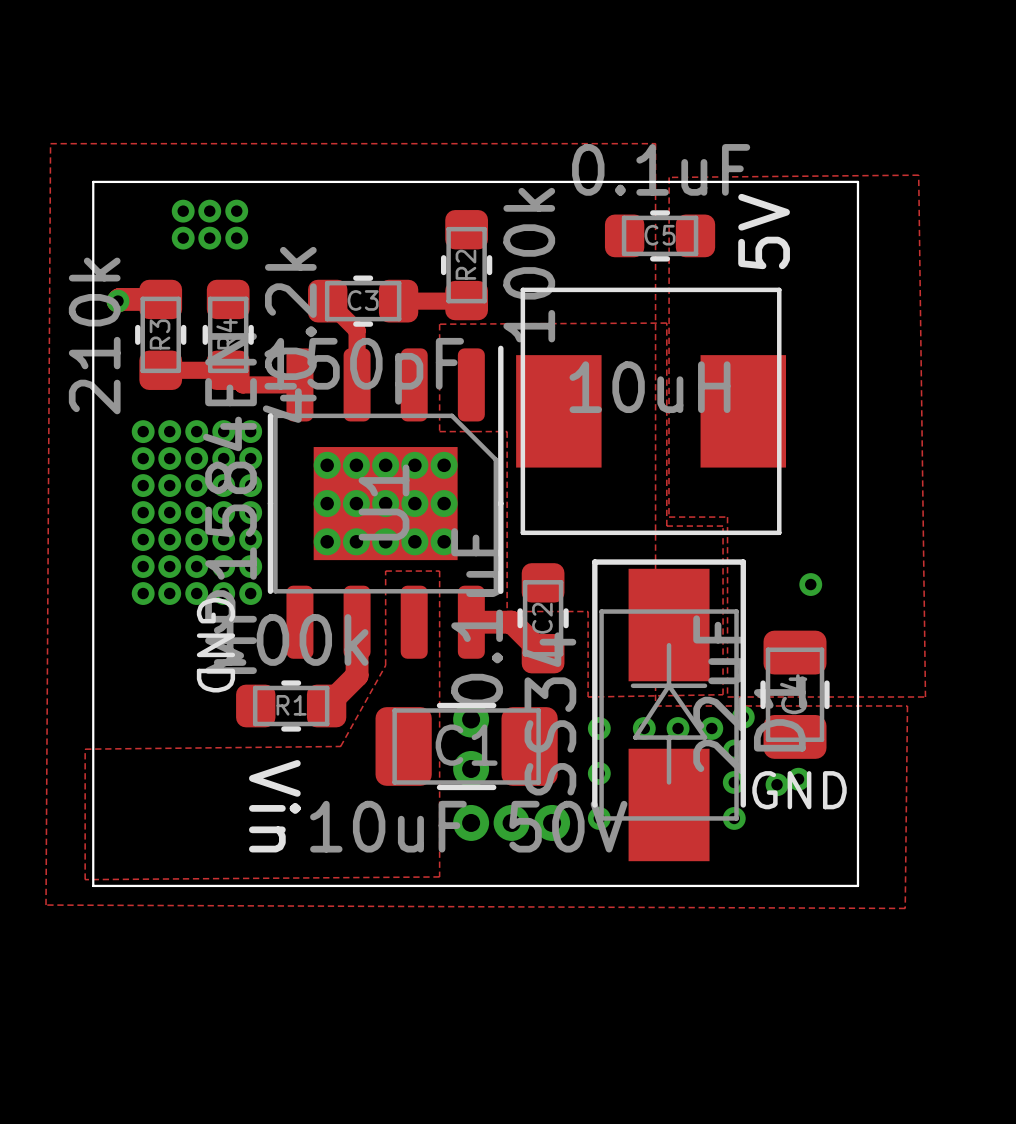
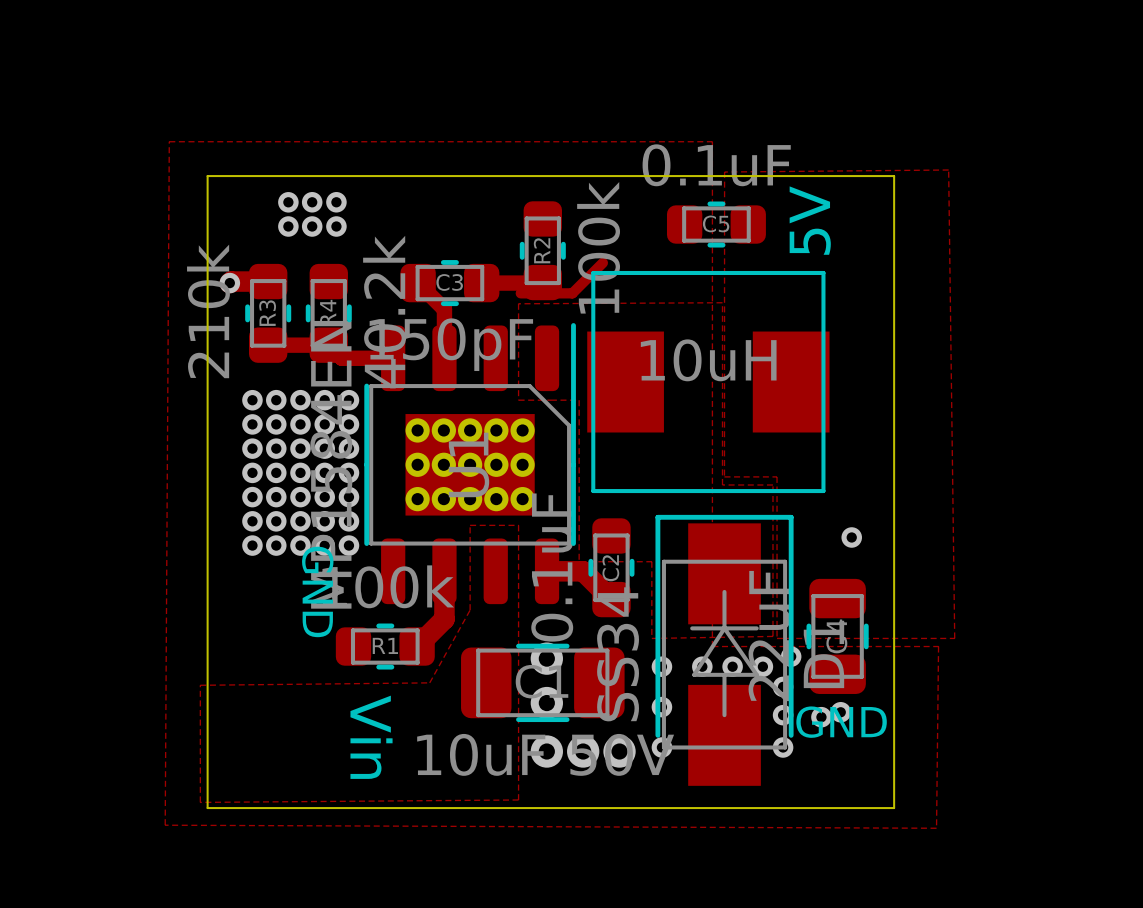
track: none -> (602, 262) (572, 293) (520, 293)

